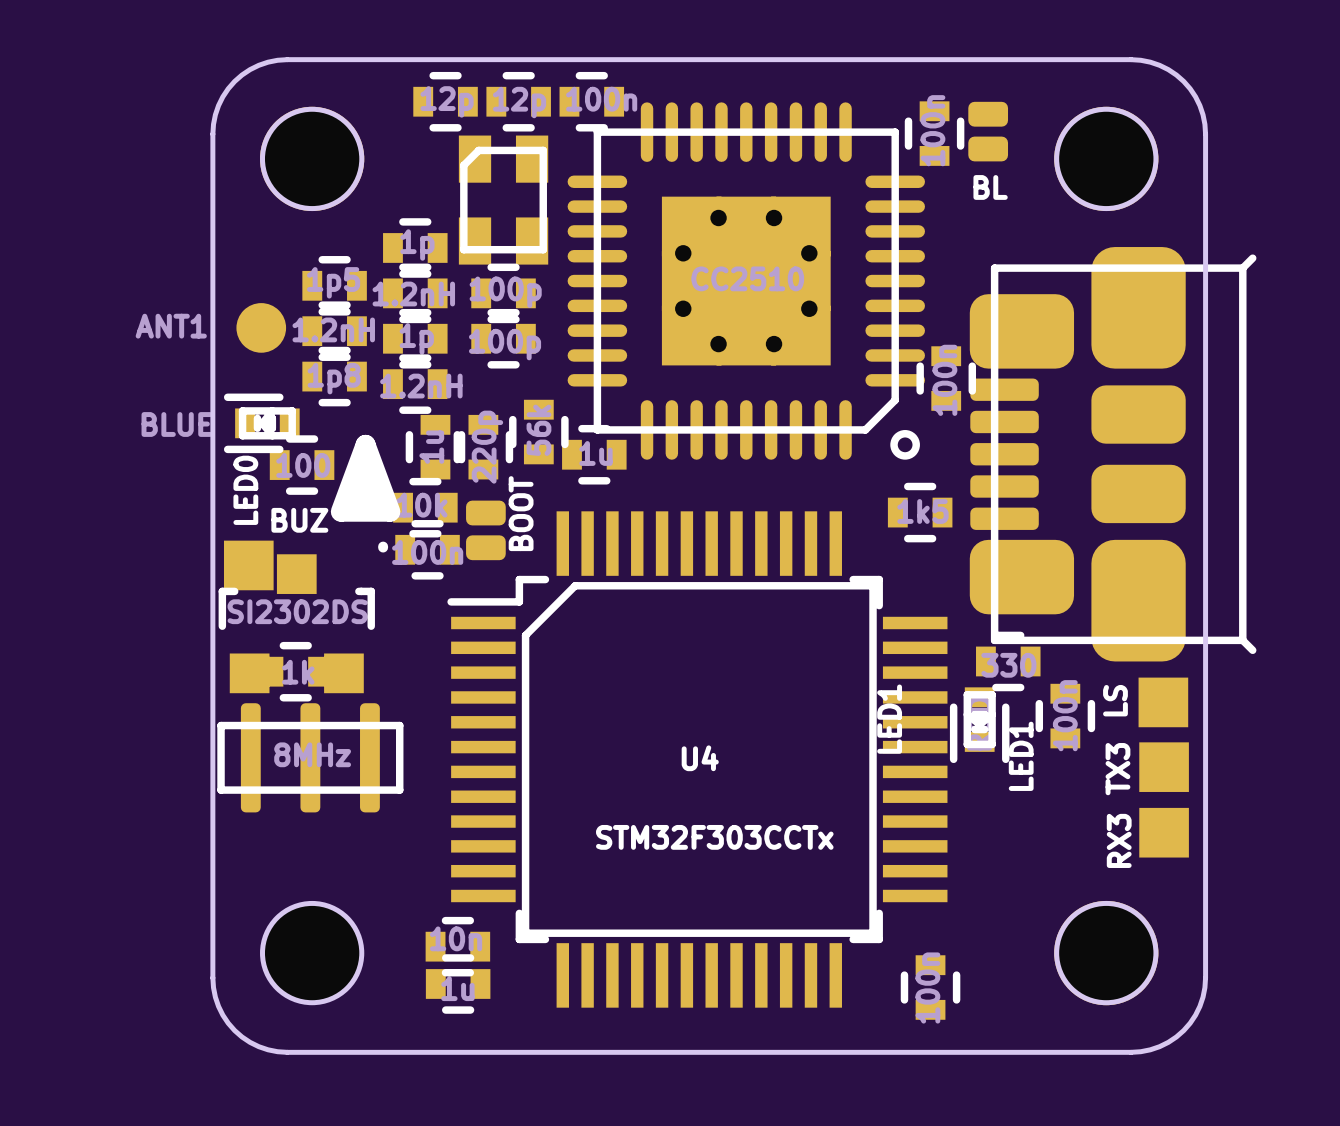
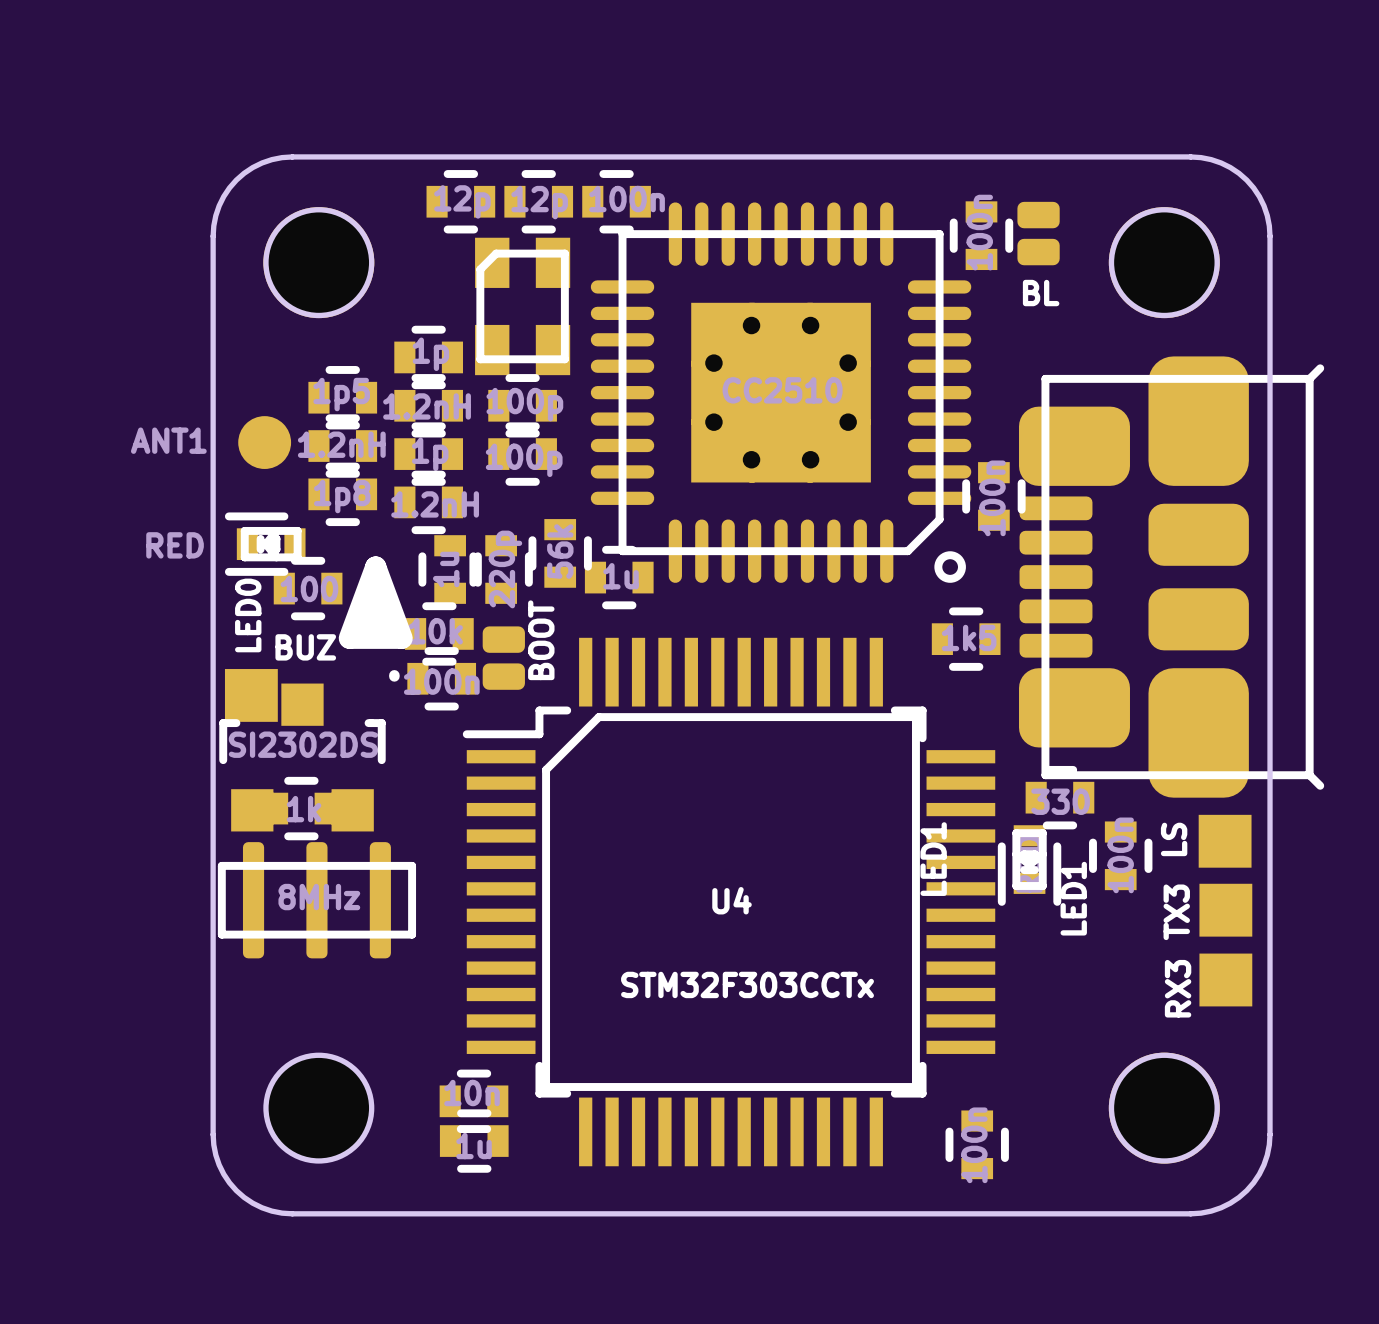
LED0 value: BLUE (177, 424) -> RED (175, 545)

